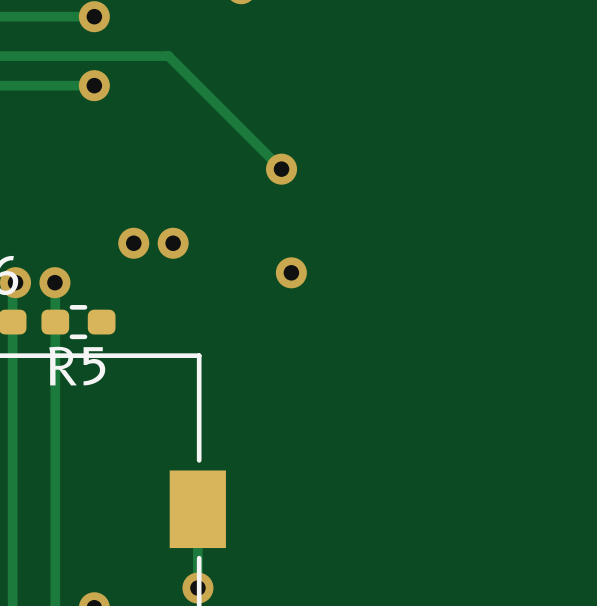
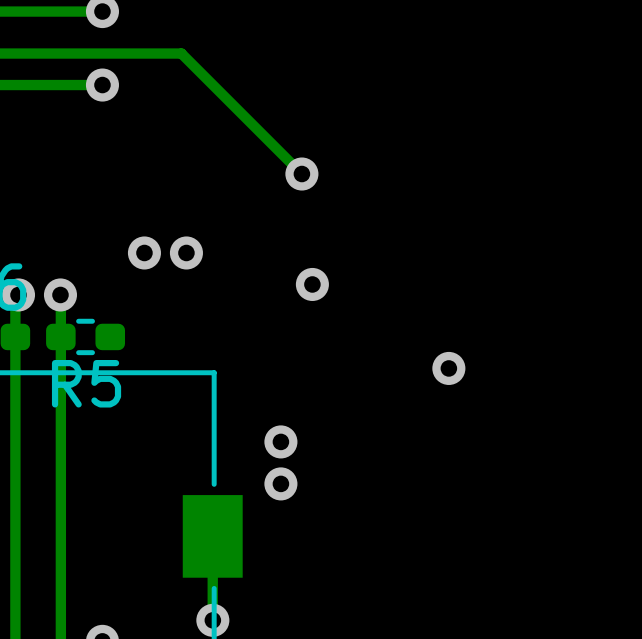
via: none -> (448, 368)
via: none -> (280, 441)
via: none -> (280, 483)

